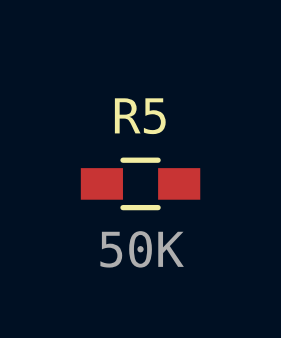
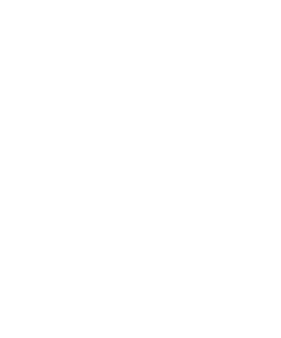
R5: 50K (140, 183) -> none

